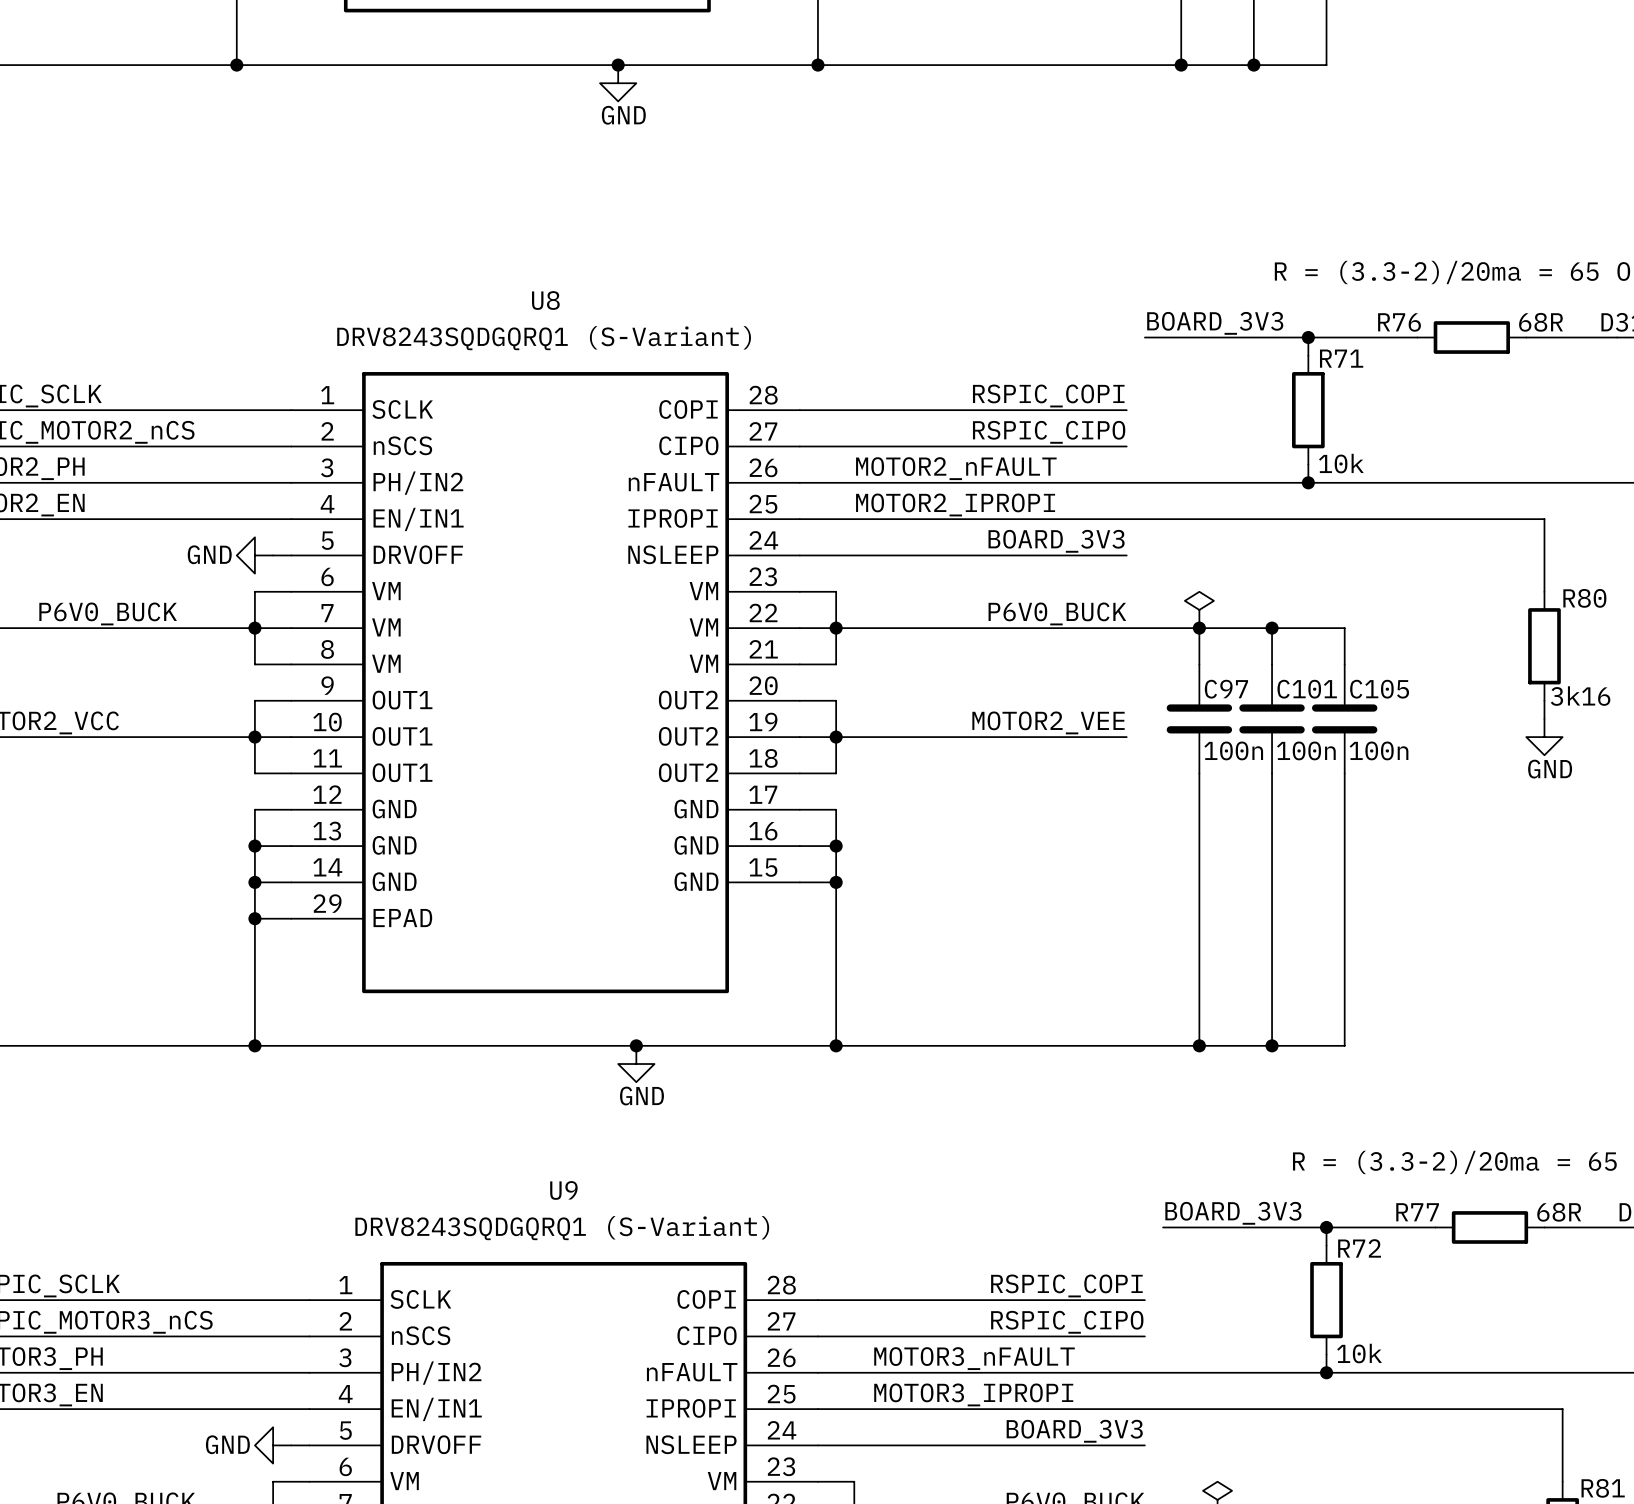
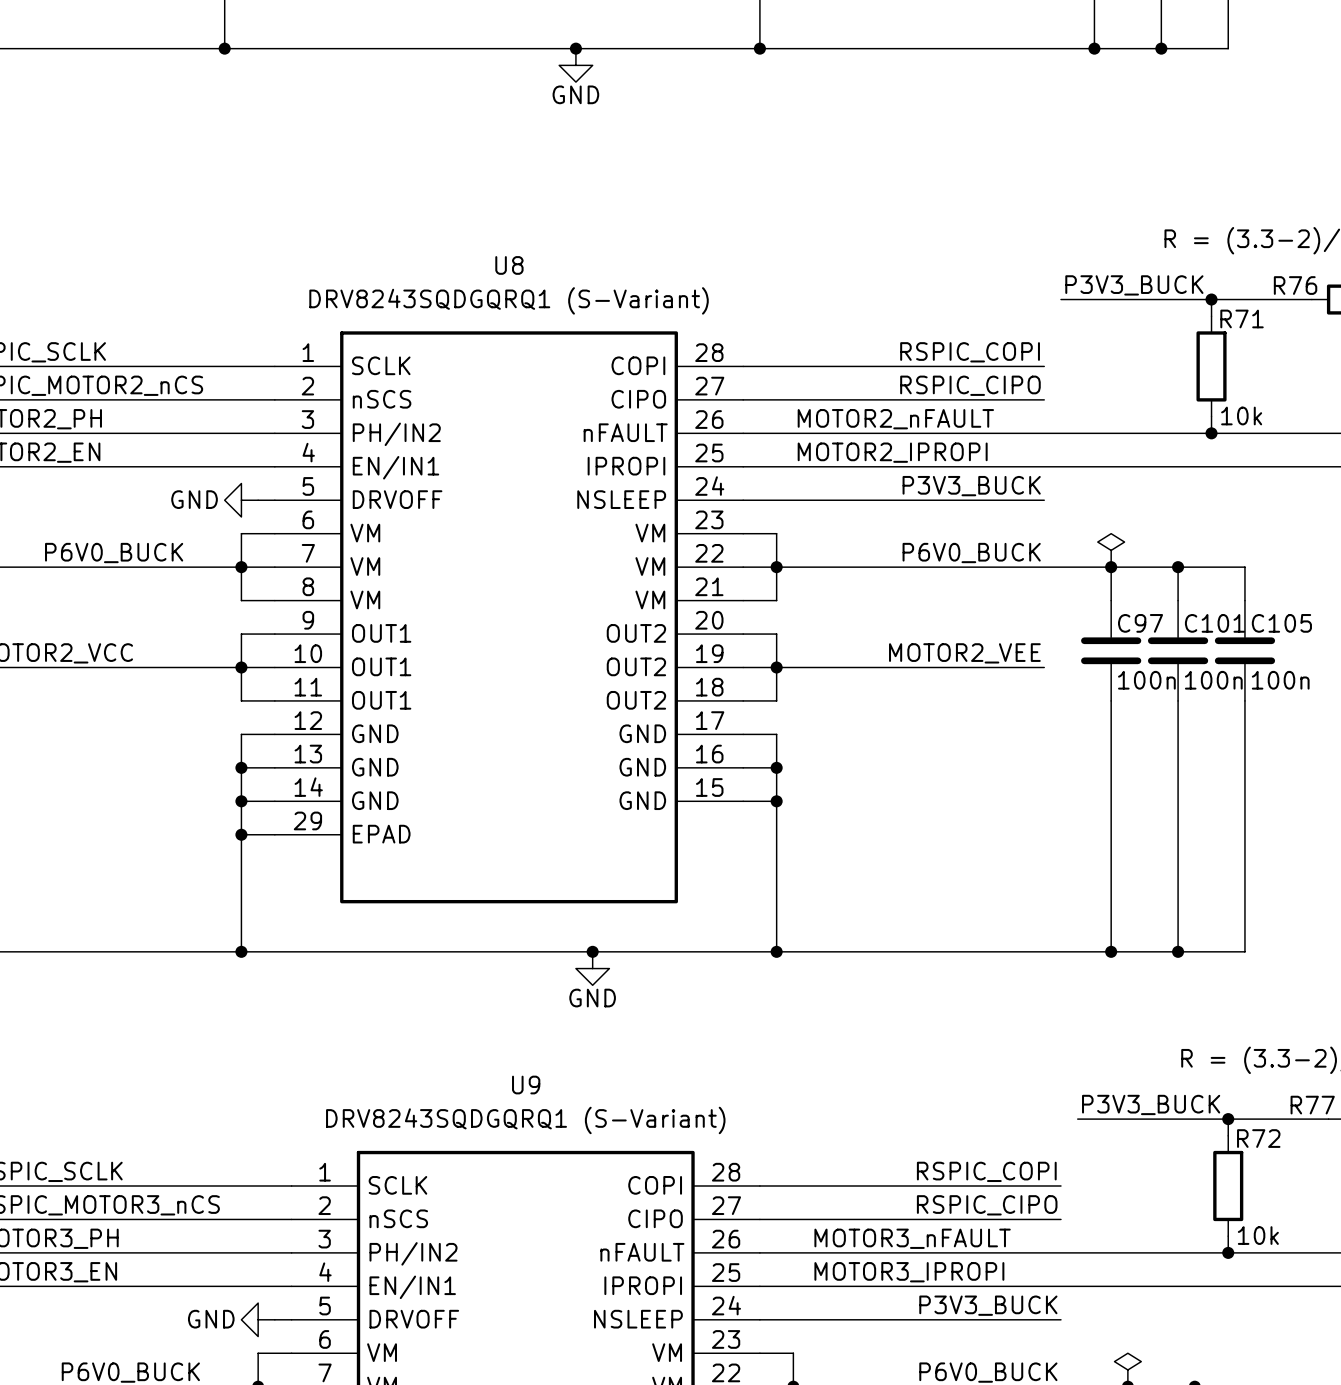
label: BOARD_3V3 (1215, 323) -> P3V3_BUCK (1134, 285)
label: BOARD_3V3 (1056, 541) -> P3V3_BUCK (971, 486)
label: BOARD_3V3 (1233, 1213) -> P3V3_BUCK (1151, 1104)
label: BOARD_3V3 (1074, 1431) -> P3V3_BUCK (988, 1305)

